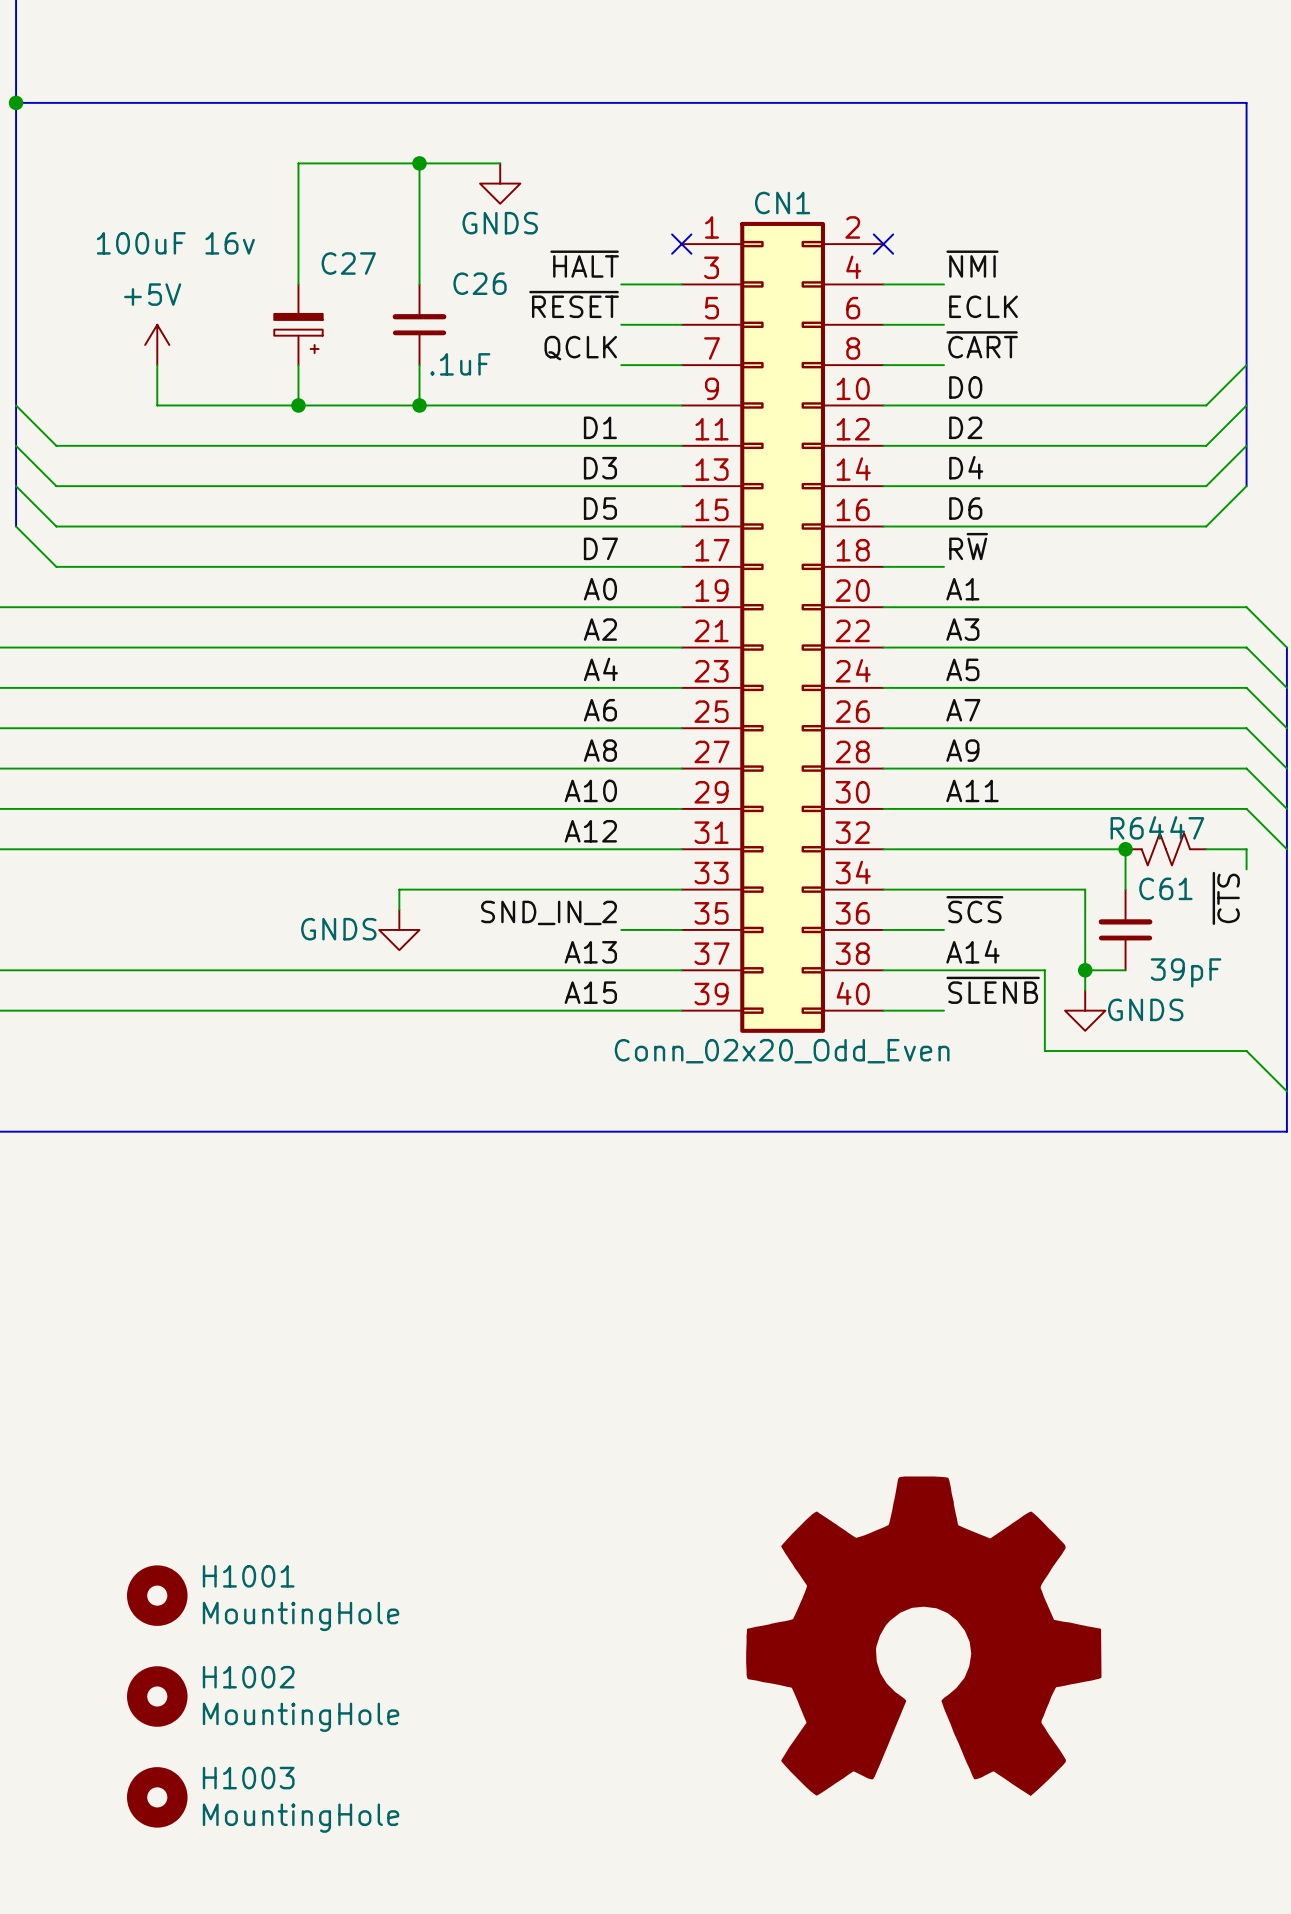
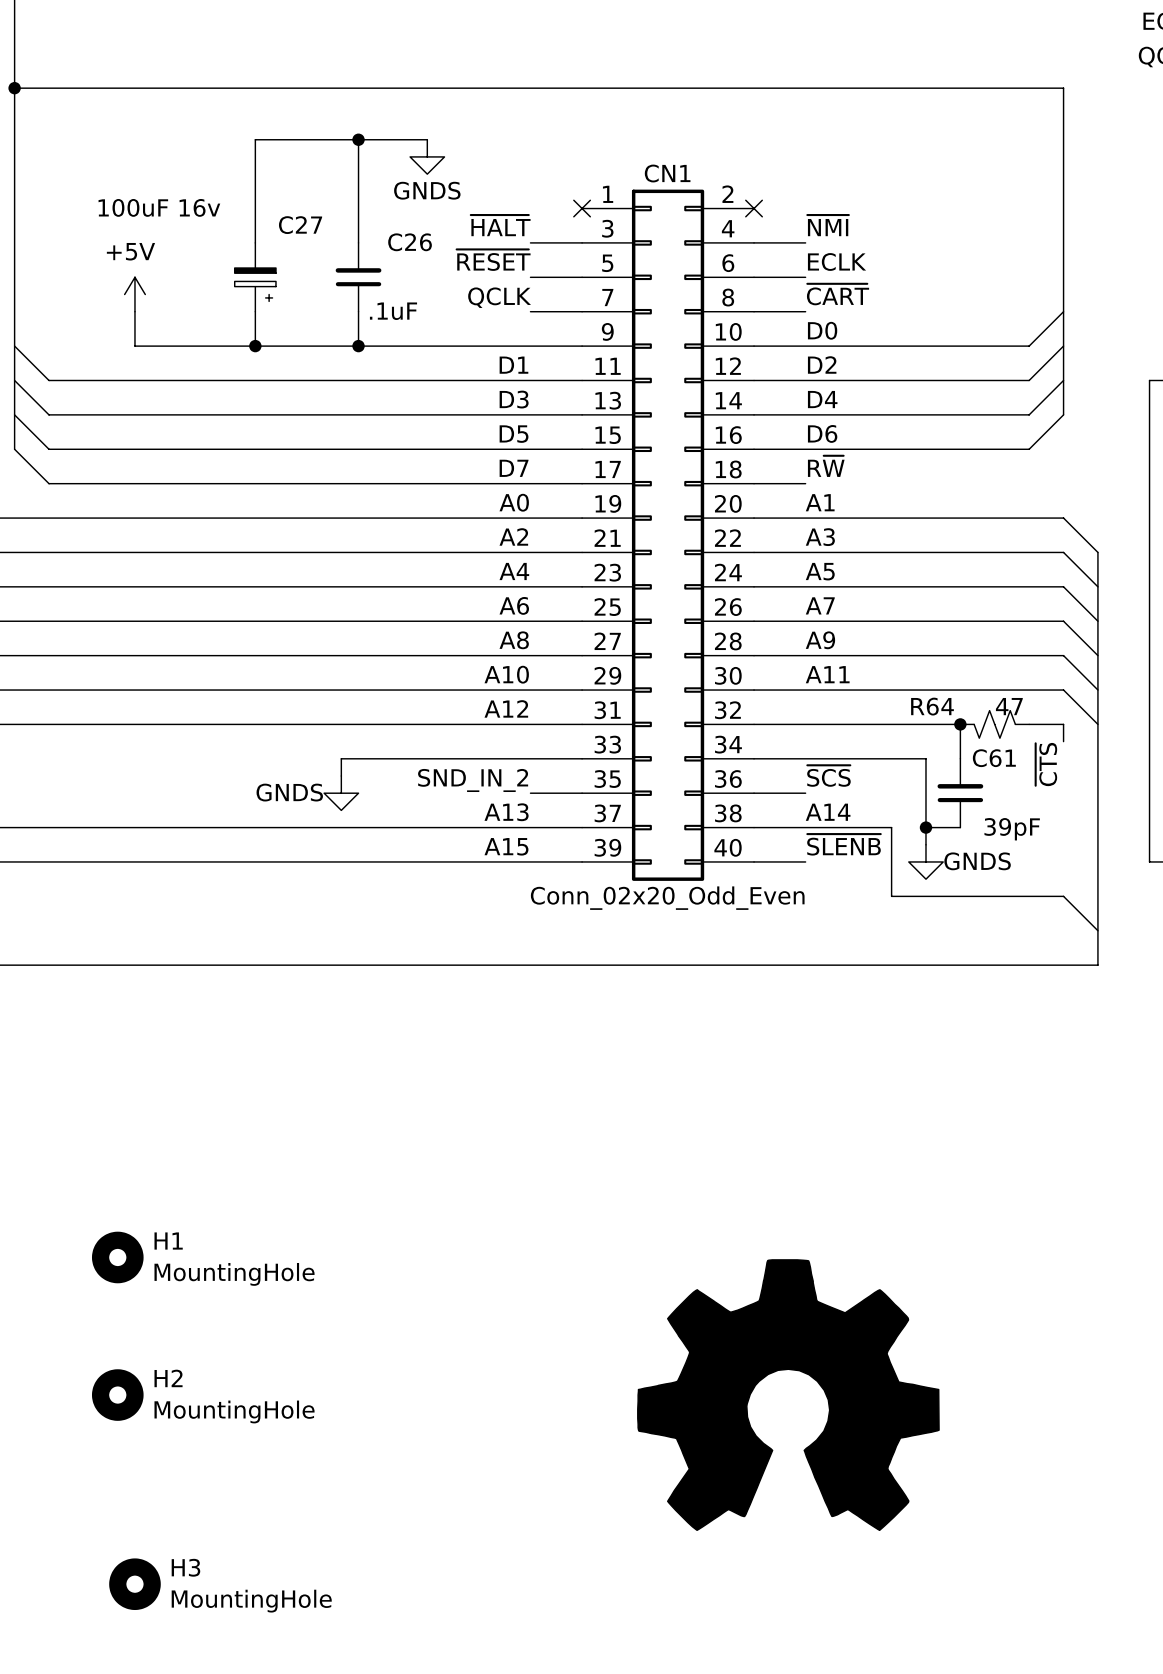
R64 name position: R64 (1137, 827) -> R64 (932, 706)
H1: none -> MountingHole (117, 1257)
H1001: MountingHole (157, 1595) -> none
H2: none -> MountingHole (117, 1395)
H1002: MountingHole (157, 1696) -> none
H1003: MountingHole (157, 1797) -> none
H3: none -> MountingHole (134, 1584)

